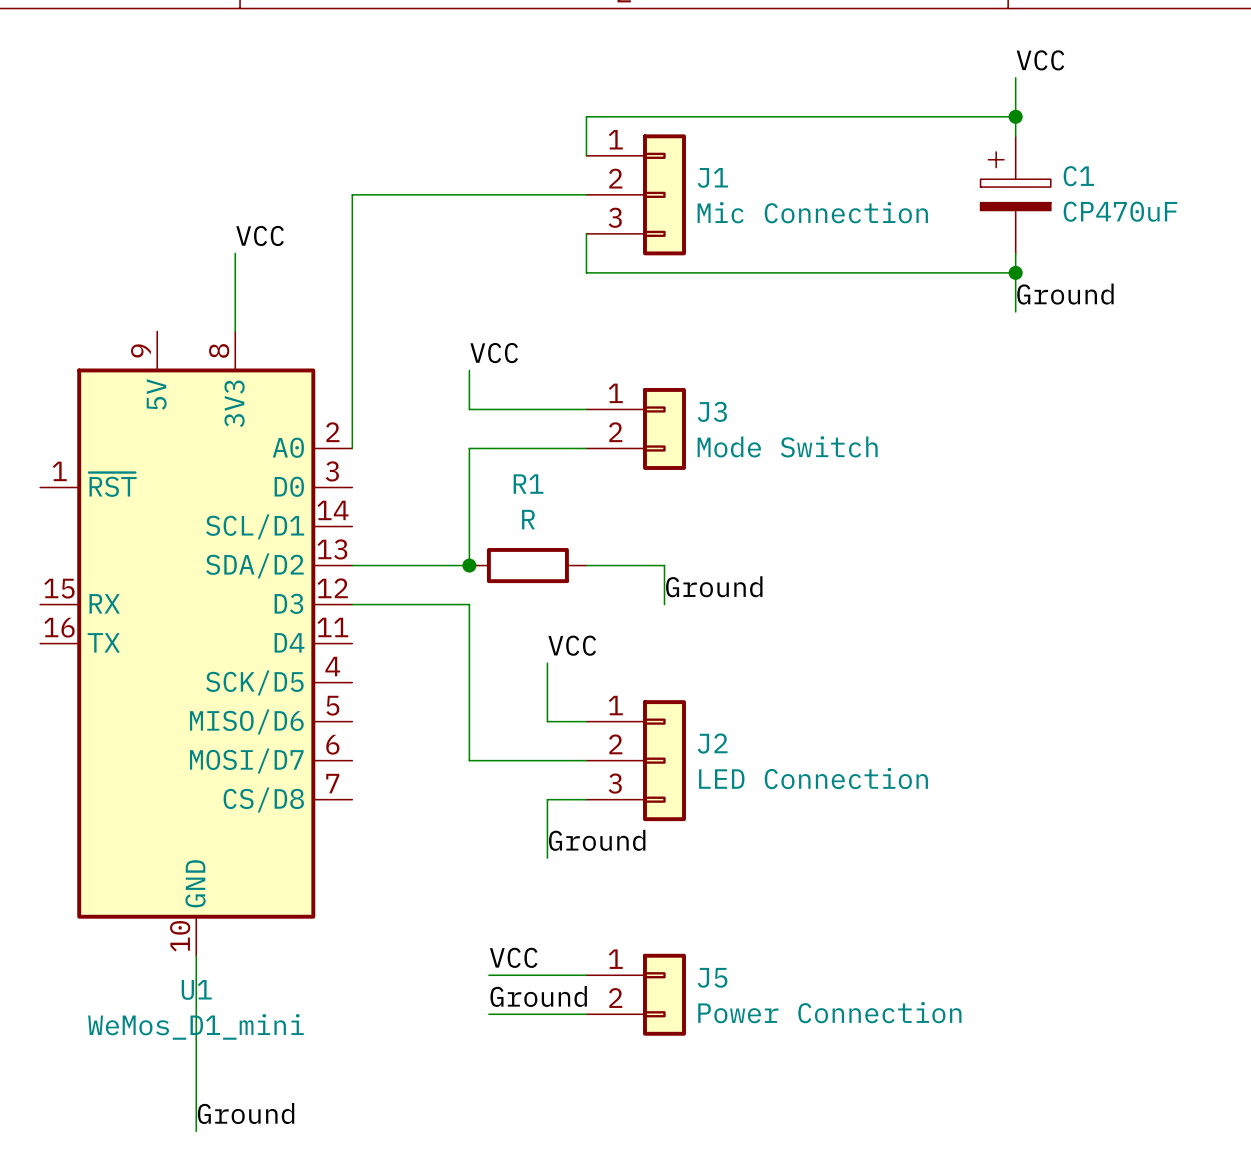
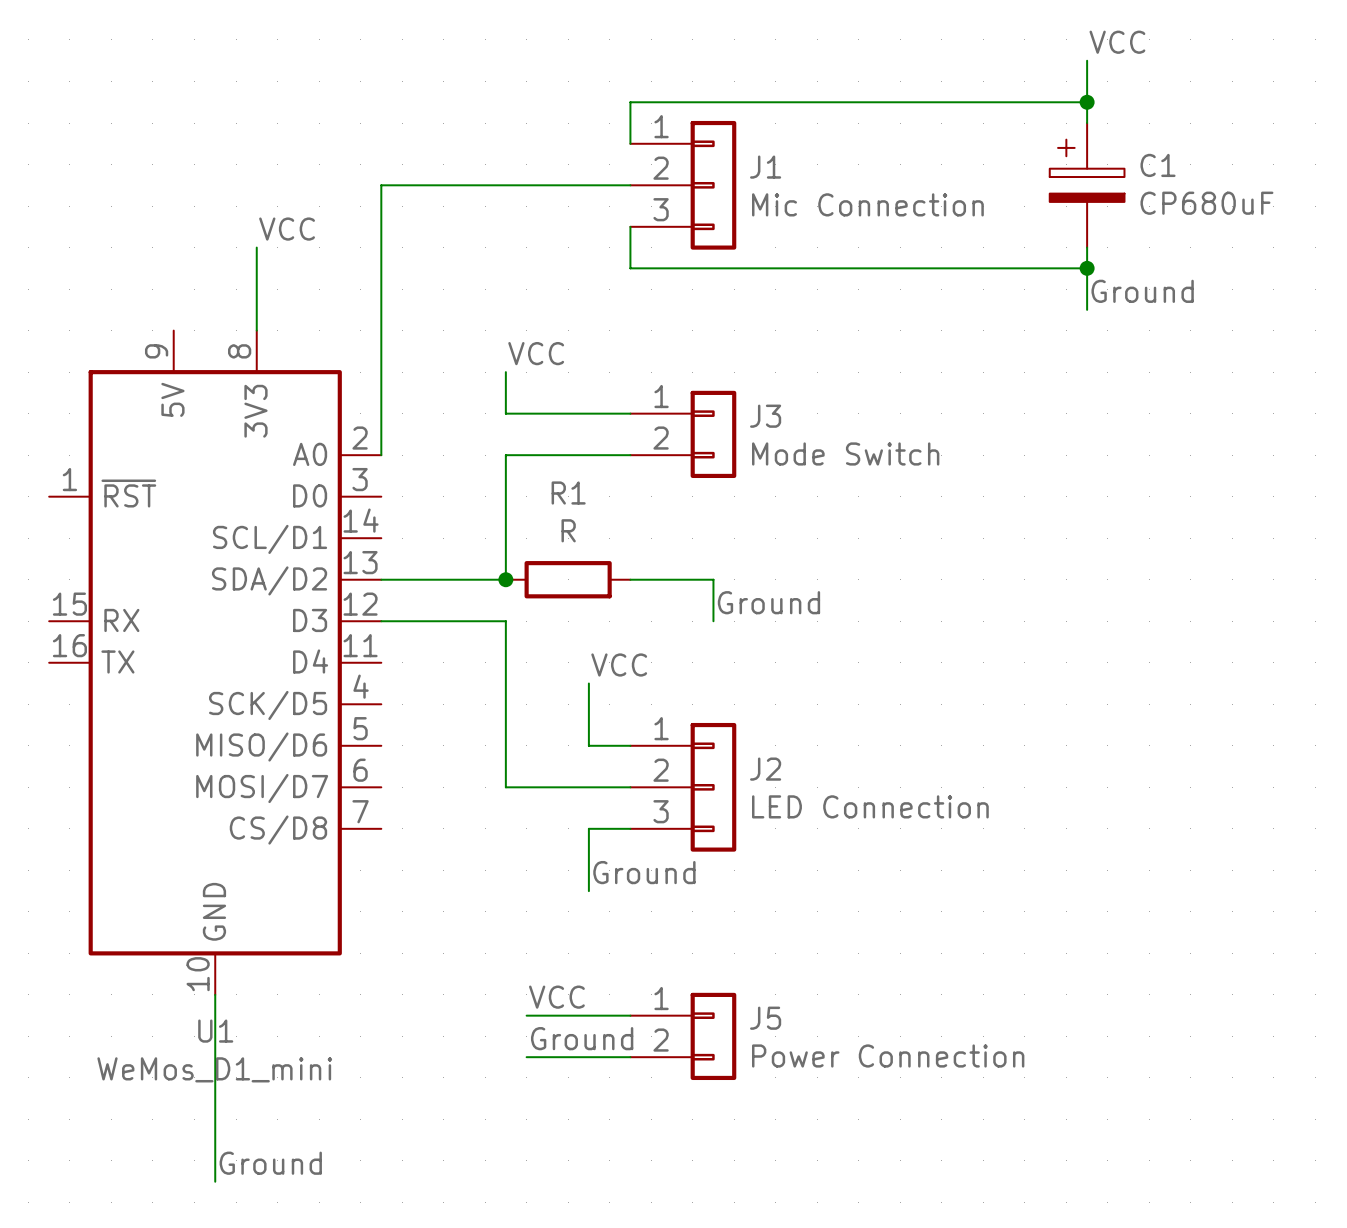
C1 value: CP470uF (1120, 211) -> CP680uF (1206, 203)

